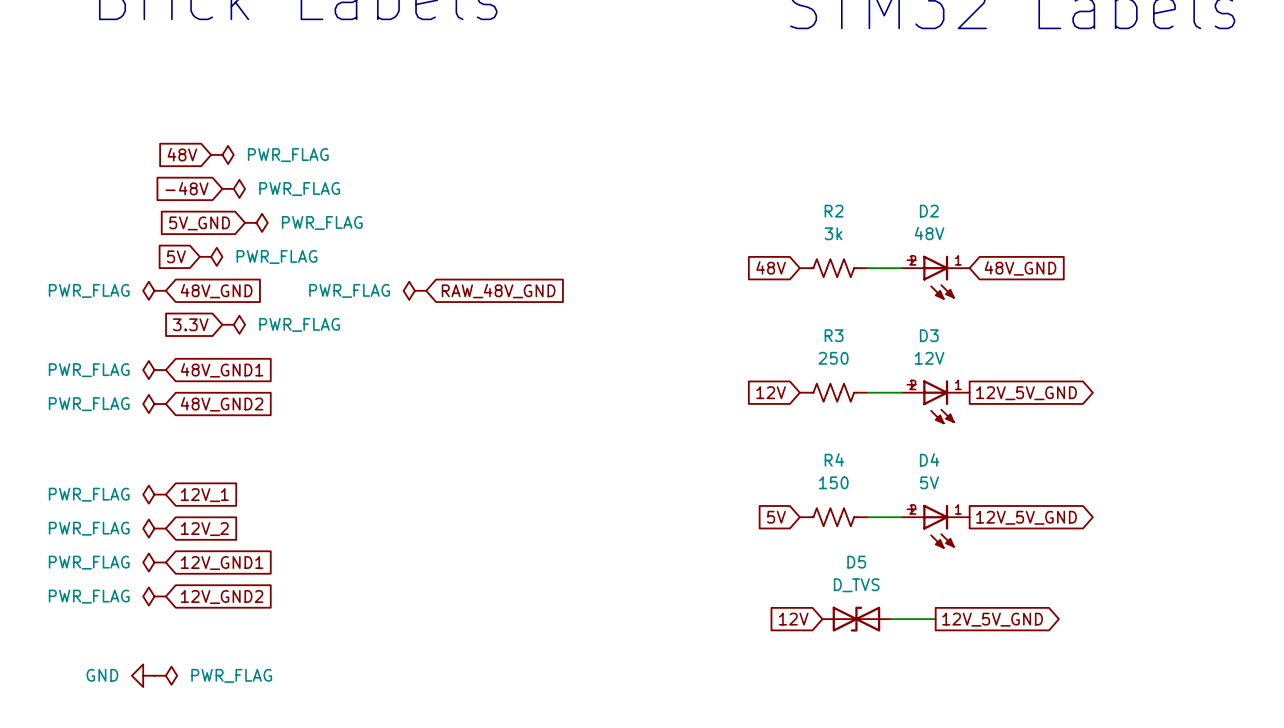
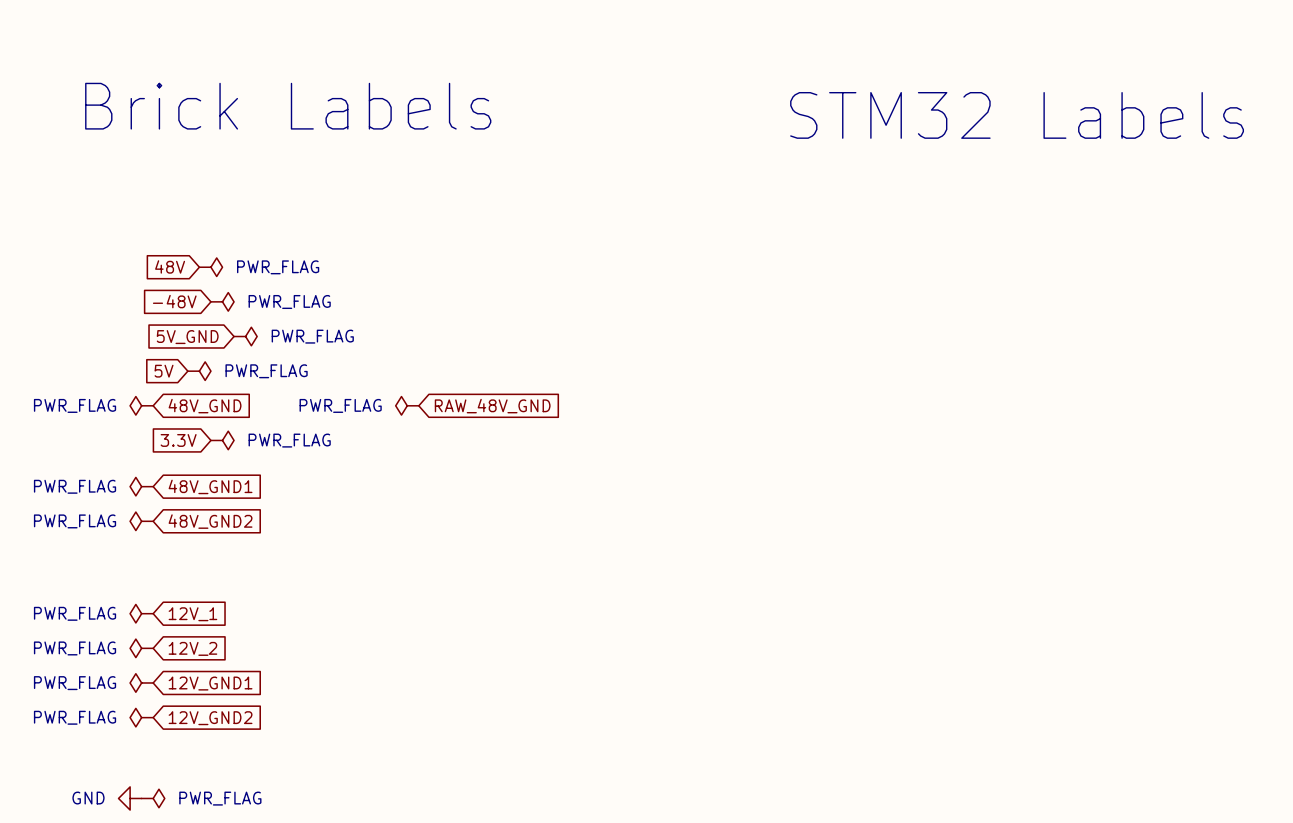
global label: 48V (771, 267) -> none
R2: 3k (833, 268) -> none
wire: (867, 268) (901, 268) -> none
global label: 48V_GND (1020, 268) -> none
D2: 48V (935, 277) -> none
global label: 12V (771, 392) -> none
R3: 250 (833, 392) -> none
wire: (867, 392) (901, 392) -> none
global label: 12V_5V_GND (1026, 393) -> none
D3: 12V (935, 402) -> none
global label: 5V (776, 517) -> none
R4: 150 (833, 517) -> none
wire: (867, 517) (901, 517) -> none
global label: 12V_5V_GND (1026, 517) -> none
D4: 5V (935, 526) -> none
global label: 12V (793, 619) -> none
D5: D_TVS (856, 619) -> none
wire: (890, 619) (935, 619) -> none
global label: 12V_5V_GND (992, 619) -> none

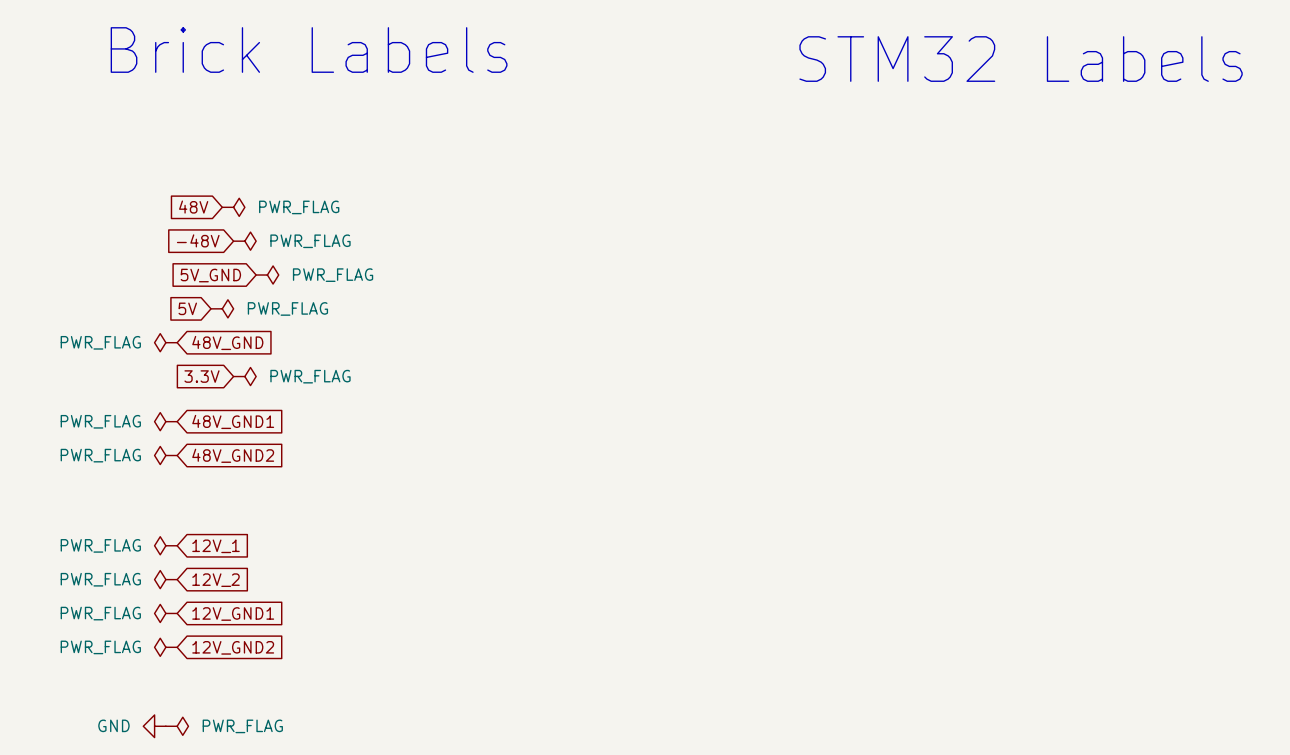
power symbol: PWR_FLAG (407, 405) -> none
global label: RAW_48V_GND (492, 406) -> none

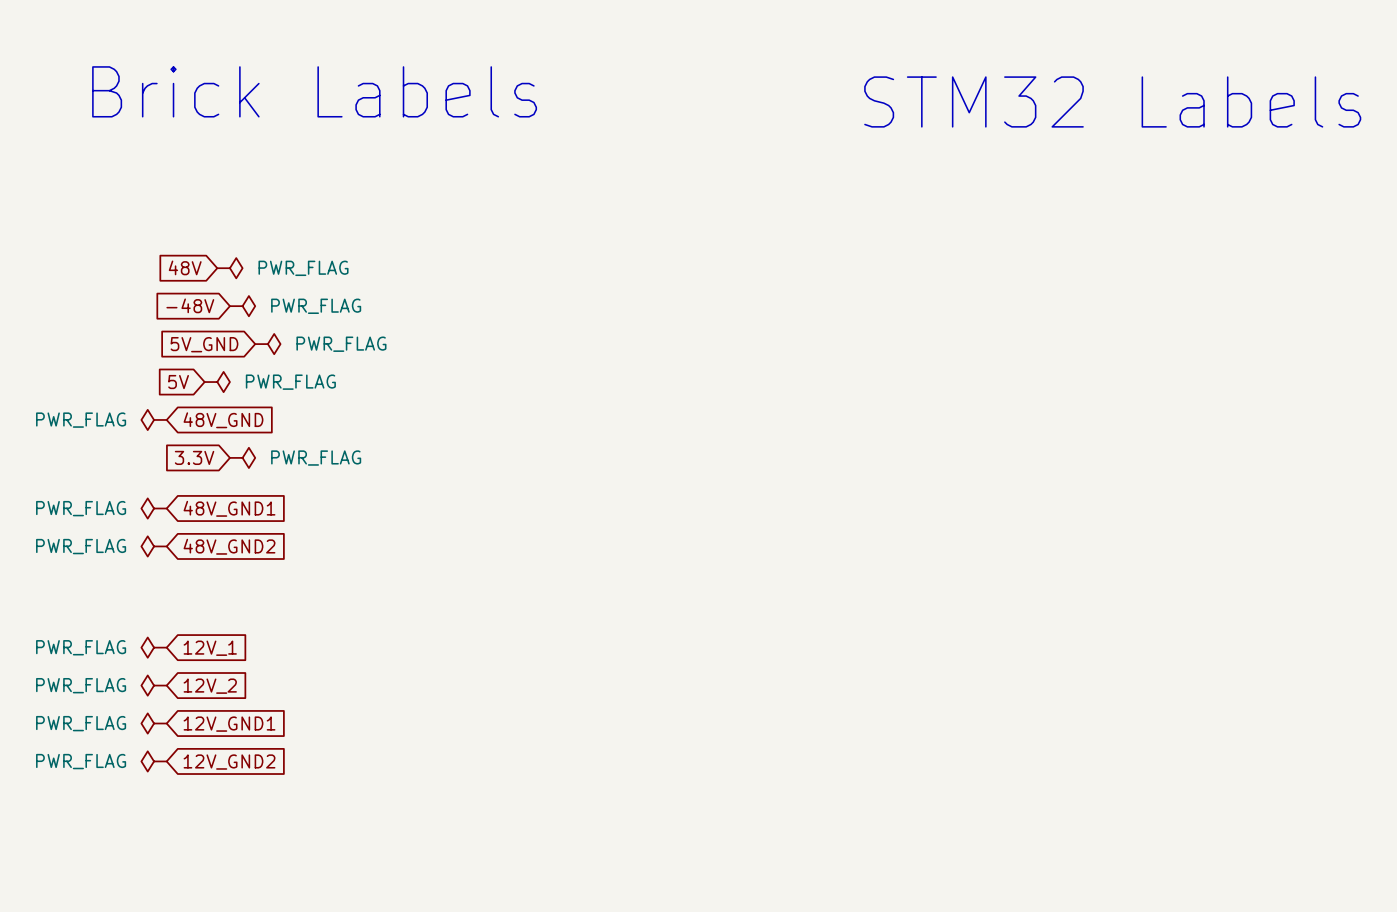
power symbol: GND (154, 726) -> none
power symbol: PWR_FLAG (177, 726) -> none

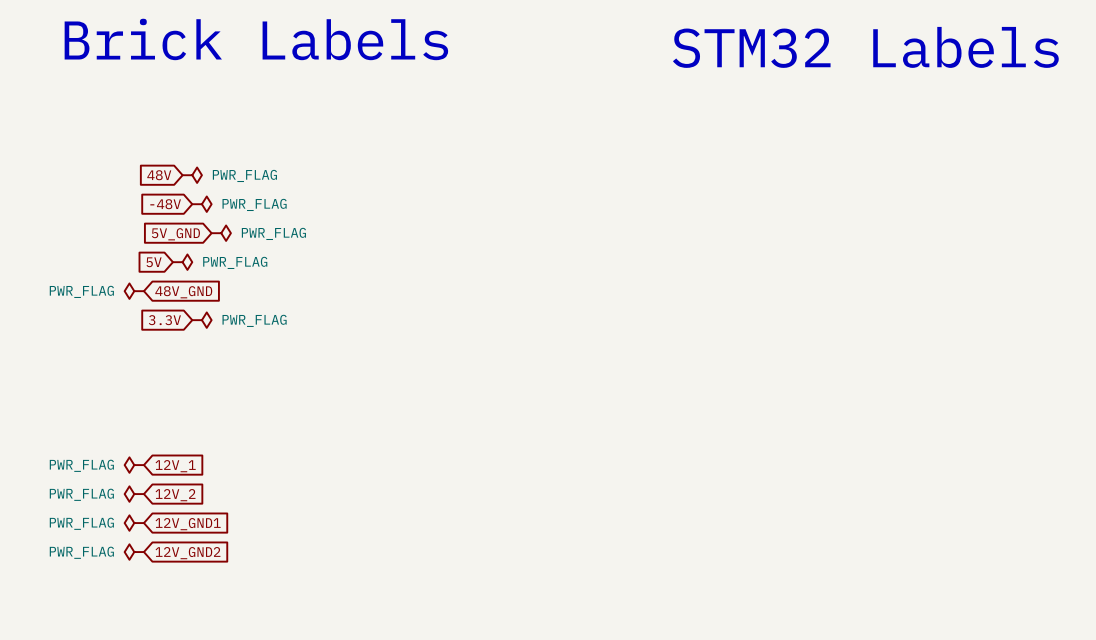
power symbol: PWR_FLAG (154, 508) -> none
global label: 48V_GND1 (229, 508) -> none
power symbol: PWR_FLAG (154, 546) -> none
global label: 48V_GND2 (229, 546) -> none

